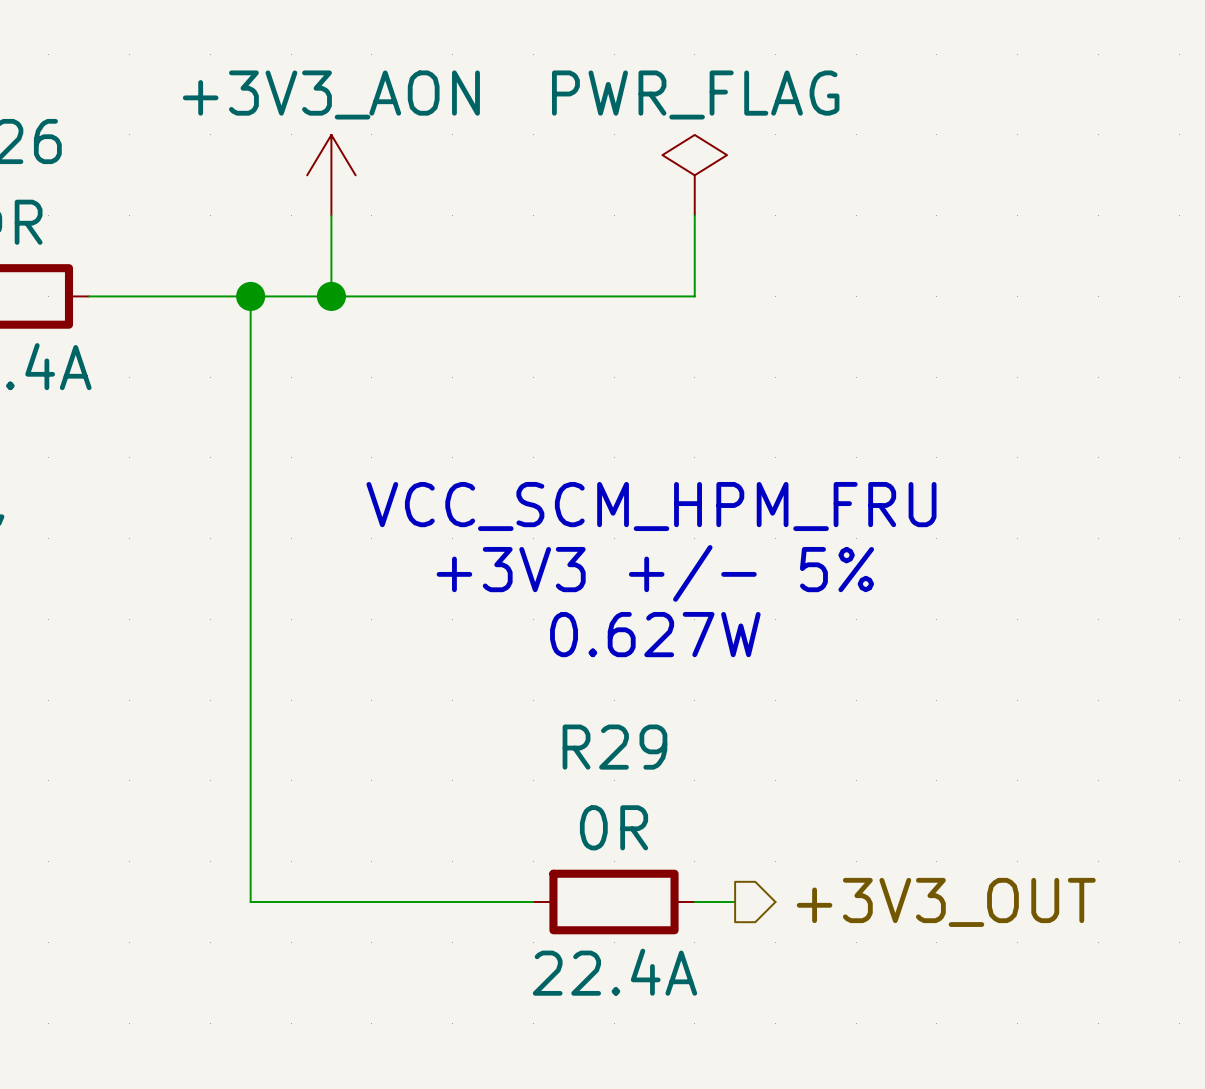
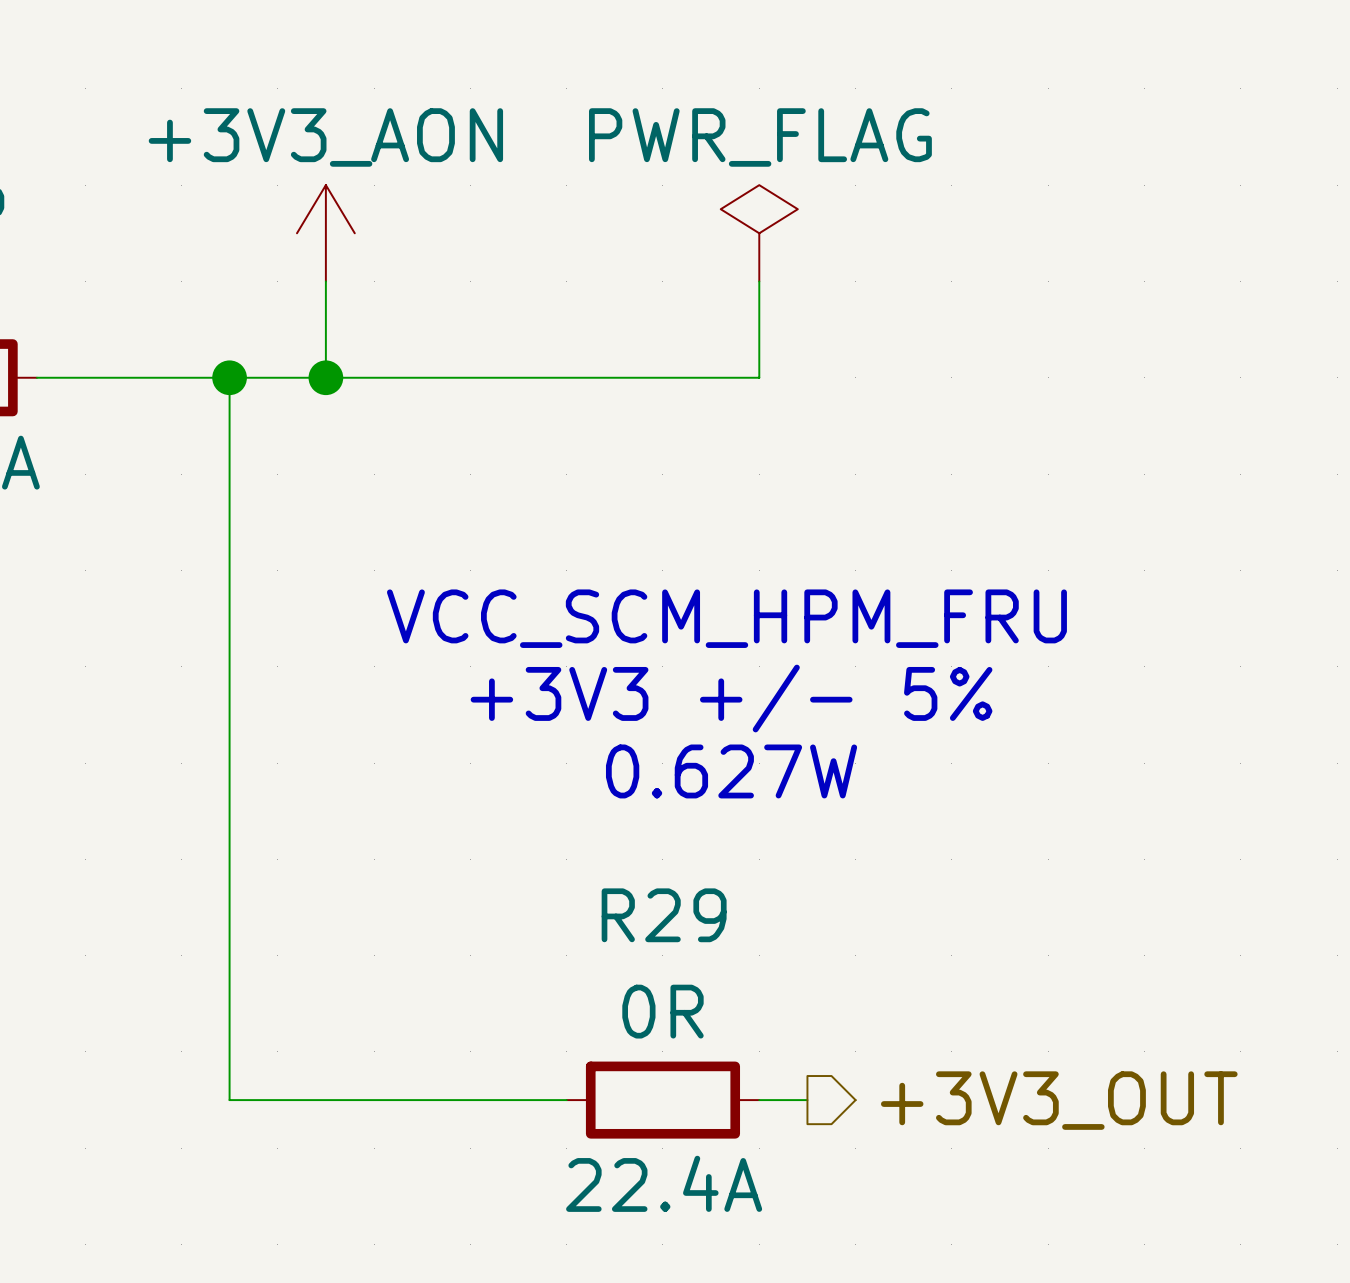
text position: VCC_SCM_HPM_FRU (651, 506) -> VCC_SCM_HPM_FRU (726, 618)
text position: +3V3 +/- 5% (655, 573) -> +3V3 +/- 5% (731, 698)
text position: 0.627W (655, 634) -> 0.627W (731, 771)

